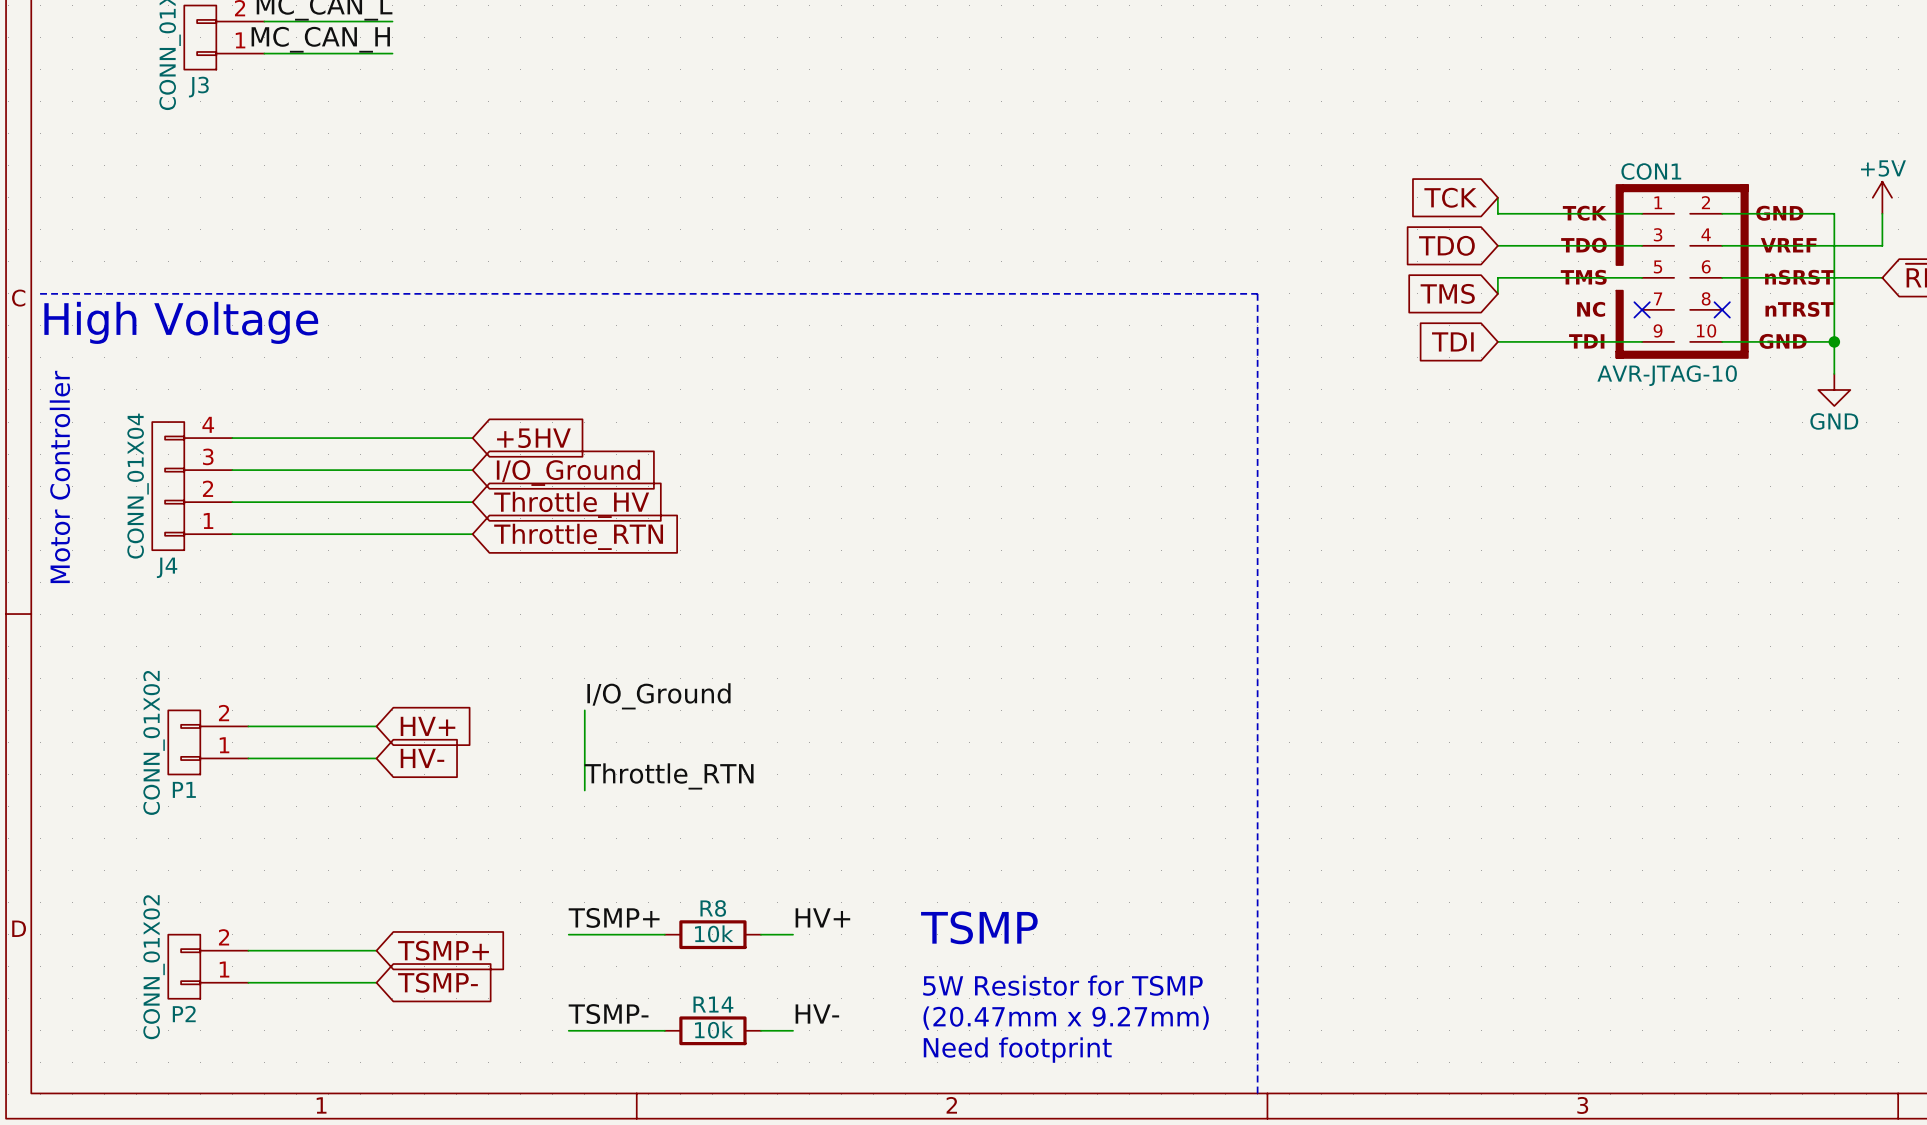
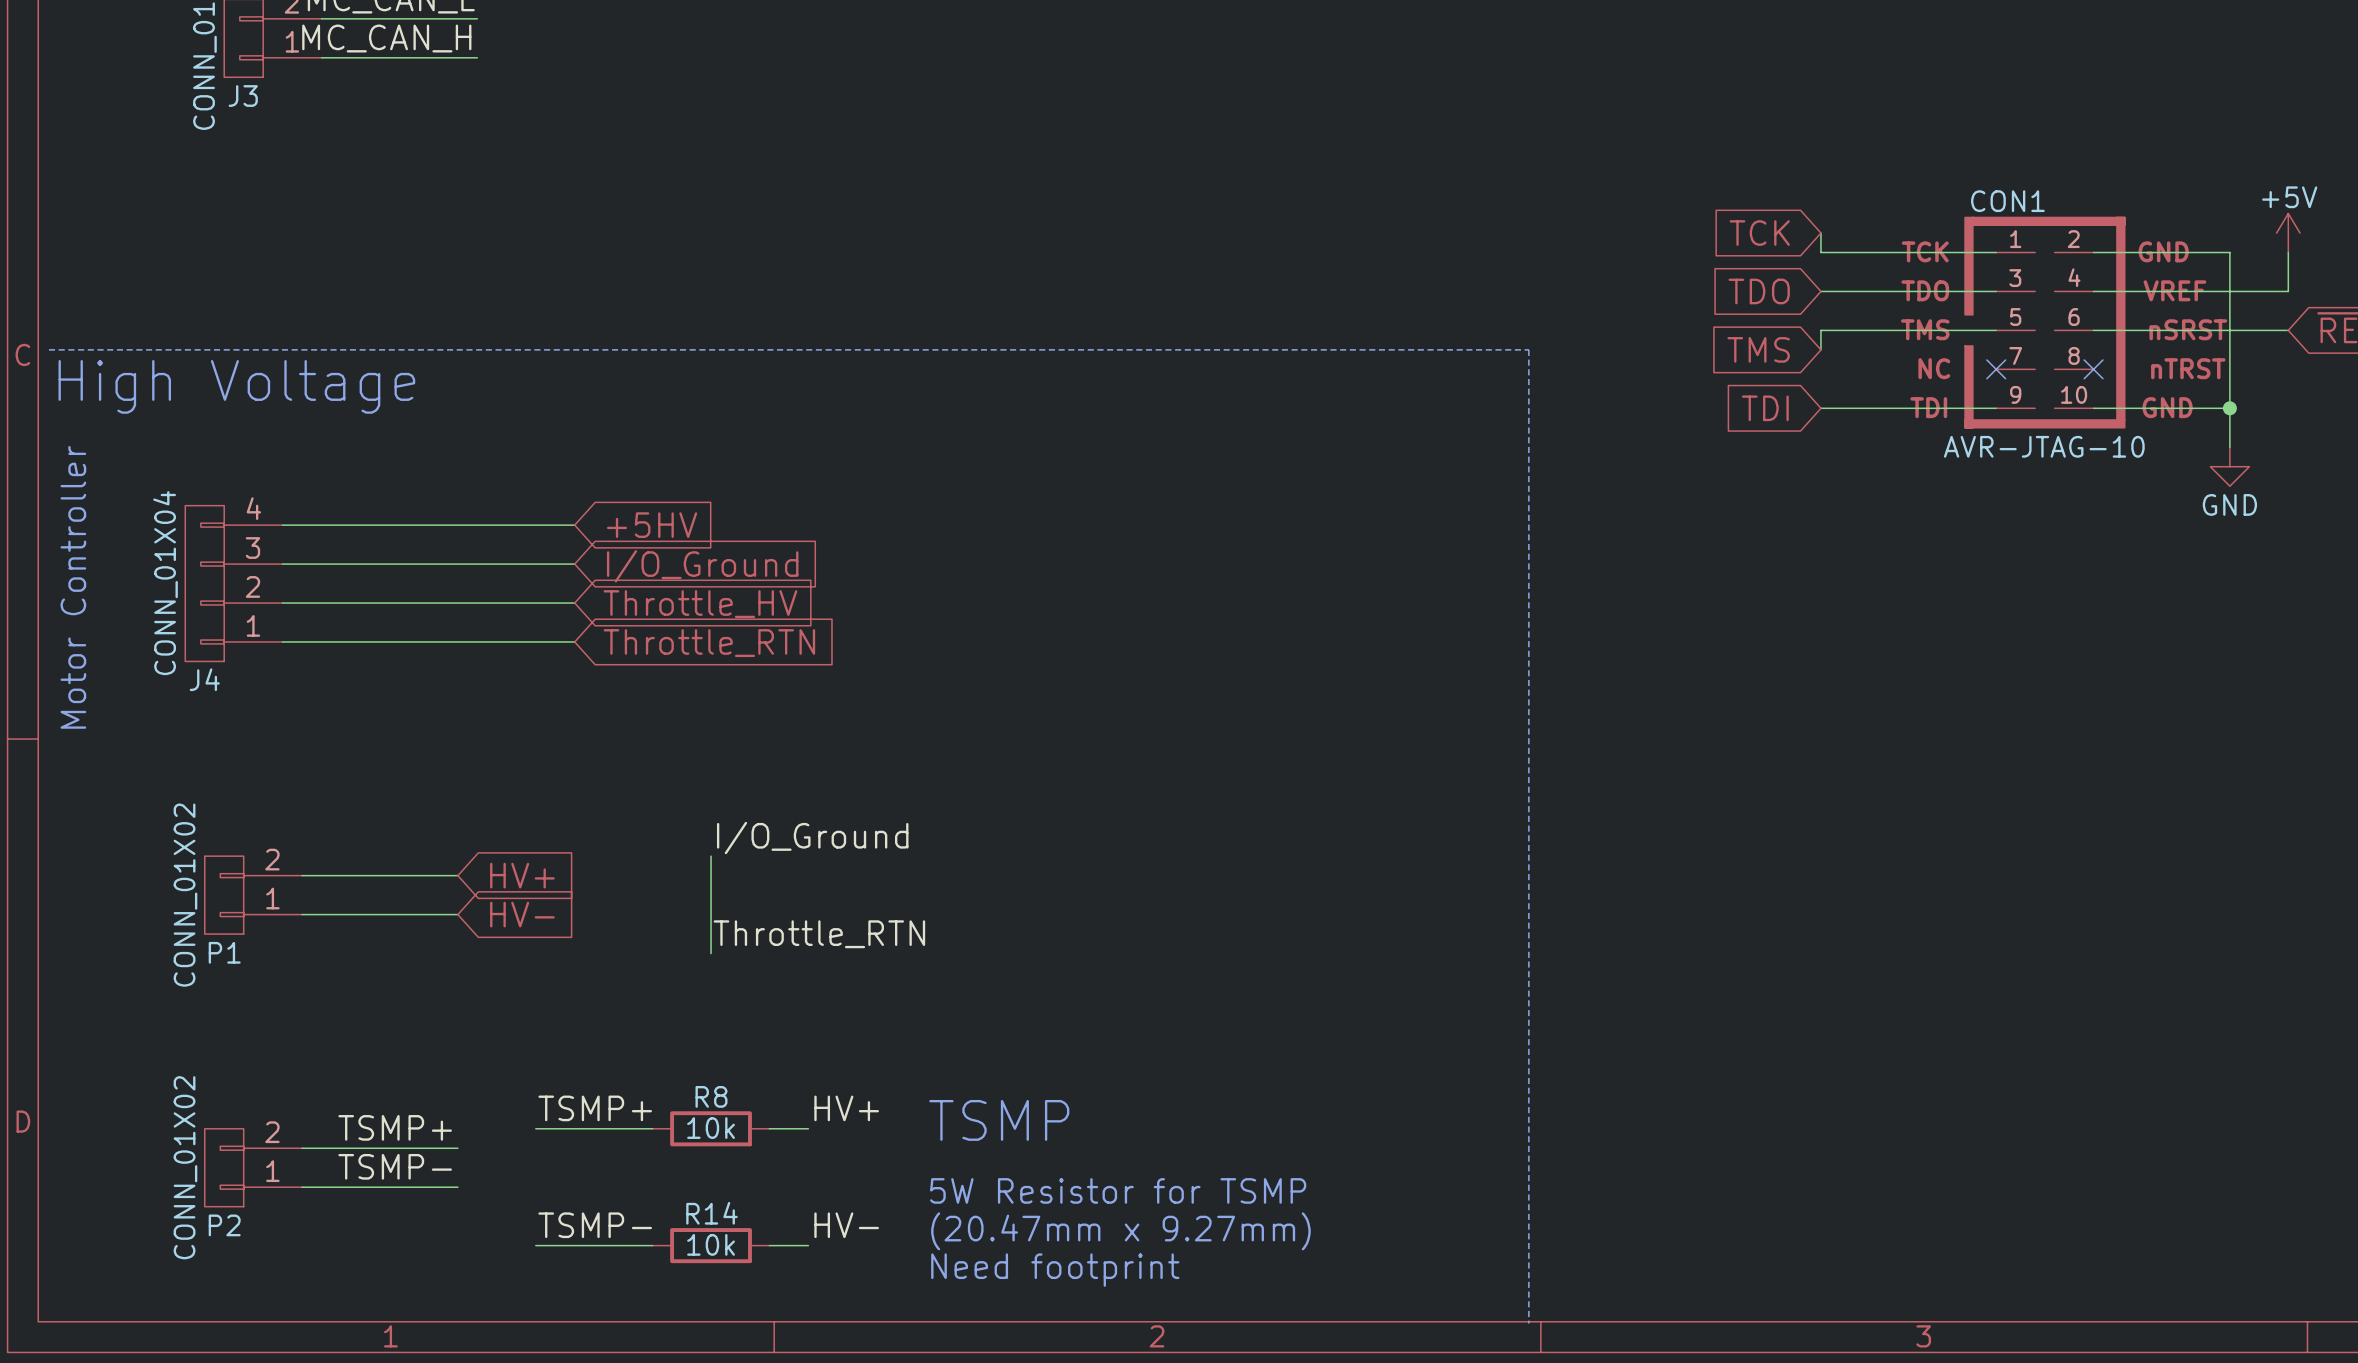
label: none -> TSMP+ (595, 1108)
label: TSMP+ (614, 917) -> none
label position: HV+ (822, 917) -> HV+ (846, 1108)
text position: TSMP (979, 927) -> TSMP (999, 1120)
label: none -> TSMP+ (395, 1127)
wire: none -> (535, 1128) (652, 1128)
wire: (568, 934) (632, 934) -> none
R8 position: (712, 934) -> (711, 1128)
wire: (760, 934) (793, 934) -> none
global label: TSMP+ (443, 950) -> none
label: none -> TSMP- (395, 1166)
global label: TSMP- (437, 982) -> none
text position: 5W Resistor for TSMP (1062, 985) -> 5W Resistor for TSMP (1118, 1190)
label: none -> TSMP- (595, 1225)
label: TSMP- (608, 1014) -> none
label position: HV- (817, 1014) -> HV- (846, 1225)
text position: (20.47mm x 9.27mm) (1066, 1018) -> (20.47mm x 9.27mm) (1120, 1231)
wire: none -> (535, 1245) (652, 1245)
wire: (568, 1030) (632, 1030) -> none
R14 position: (712, 1030) -> (711, 1245)
wire: (760, 1030) (793, 1030) -> none
text position: Need footprint (1017, 1050) -> Need footprint (1055, 1270)

